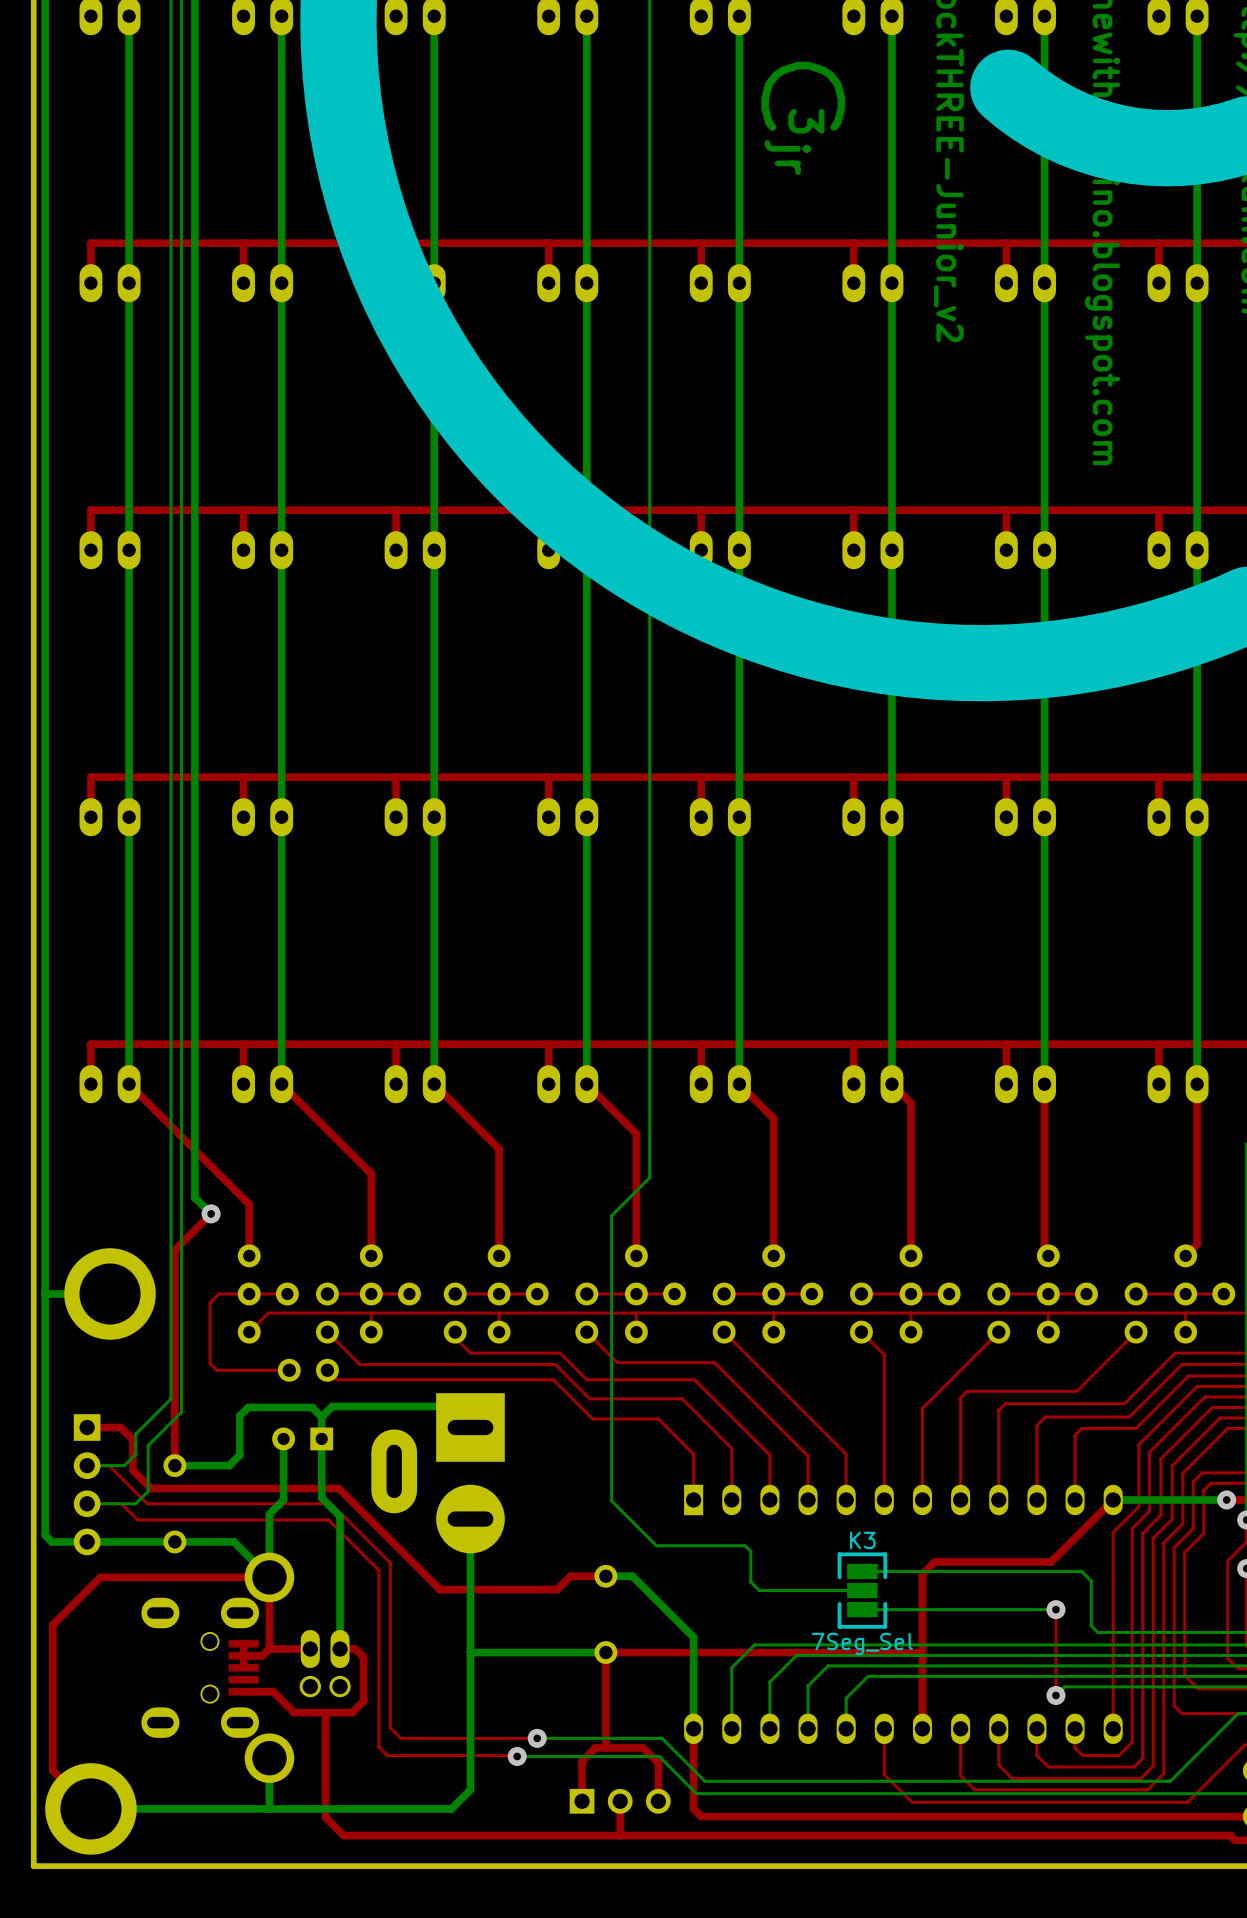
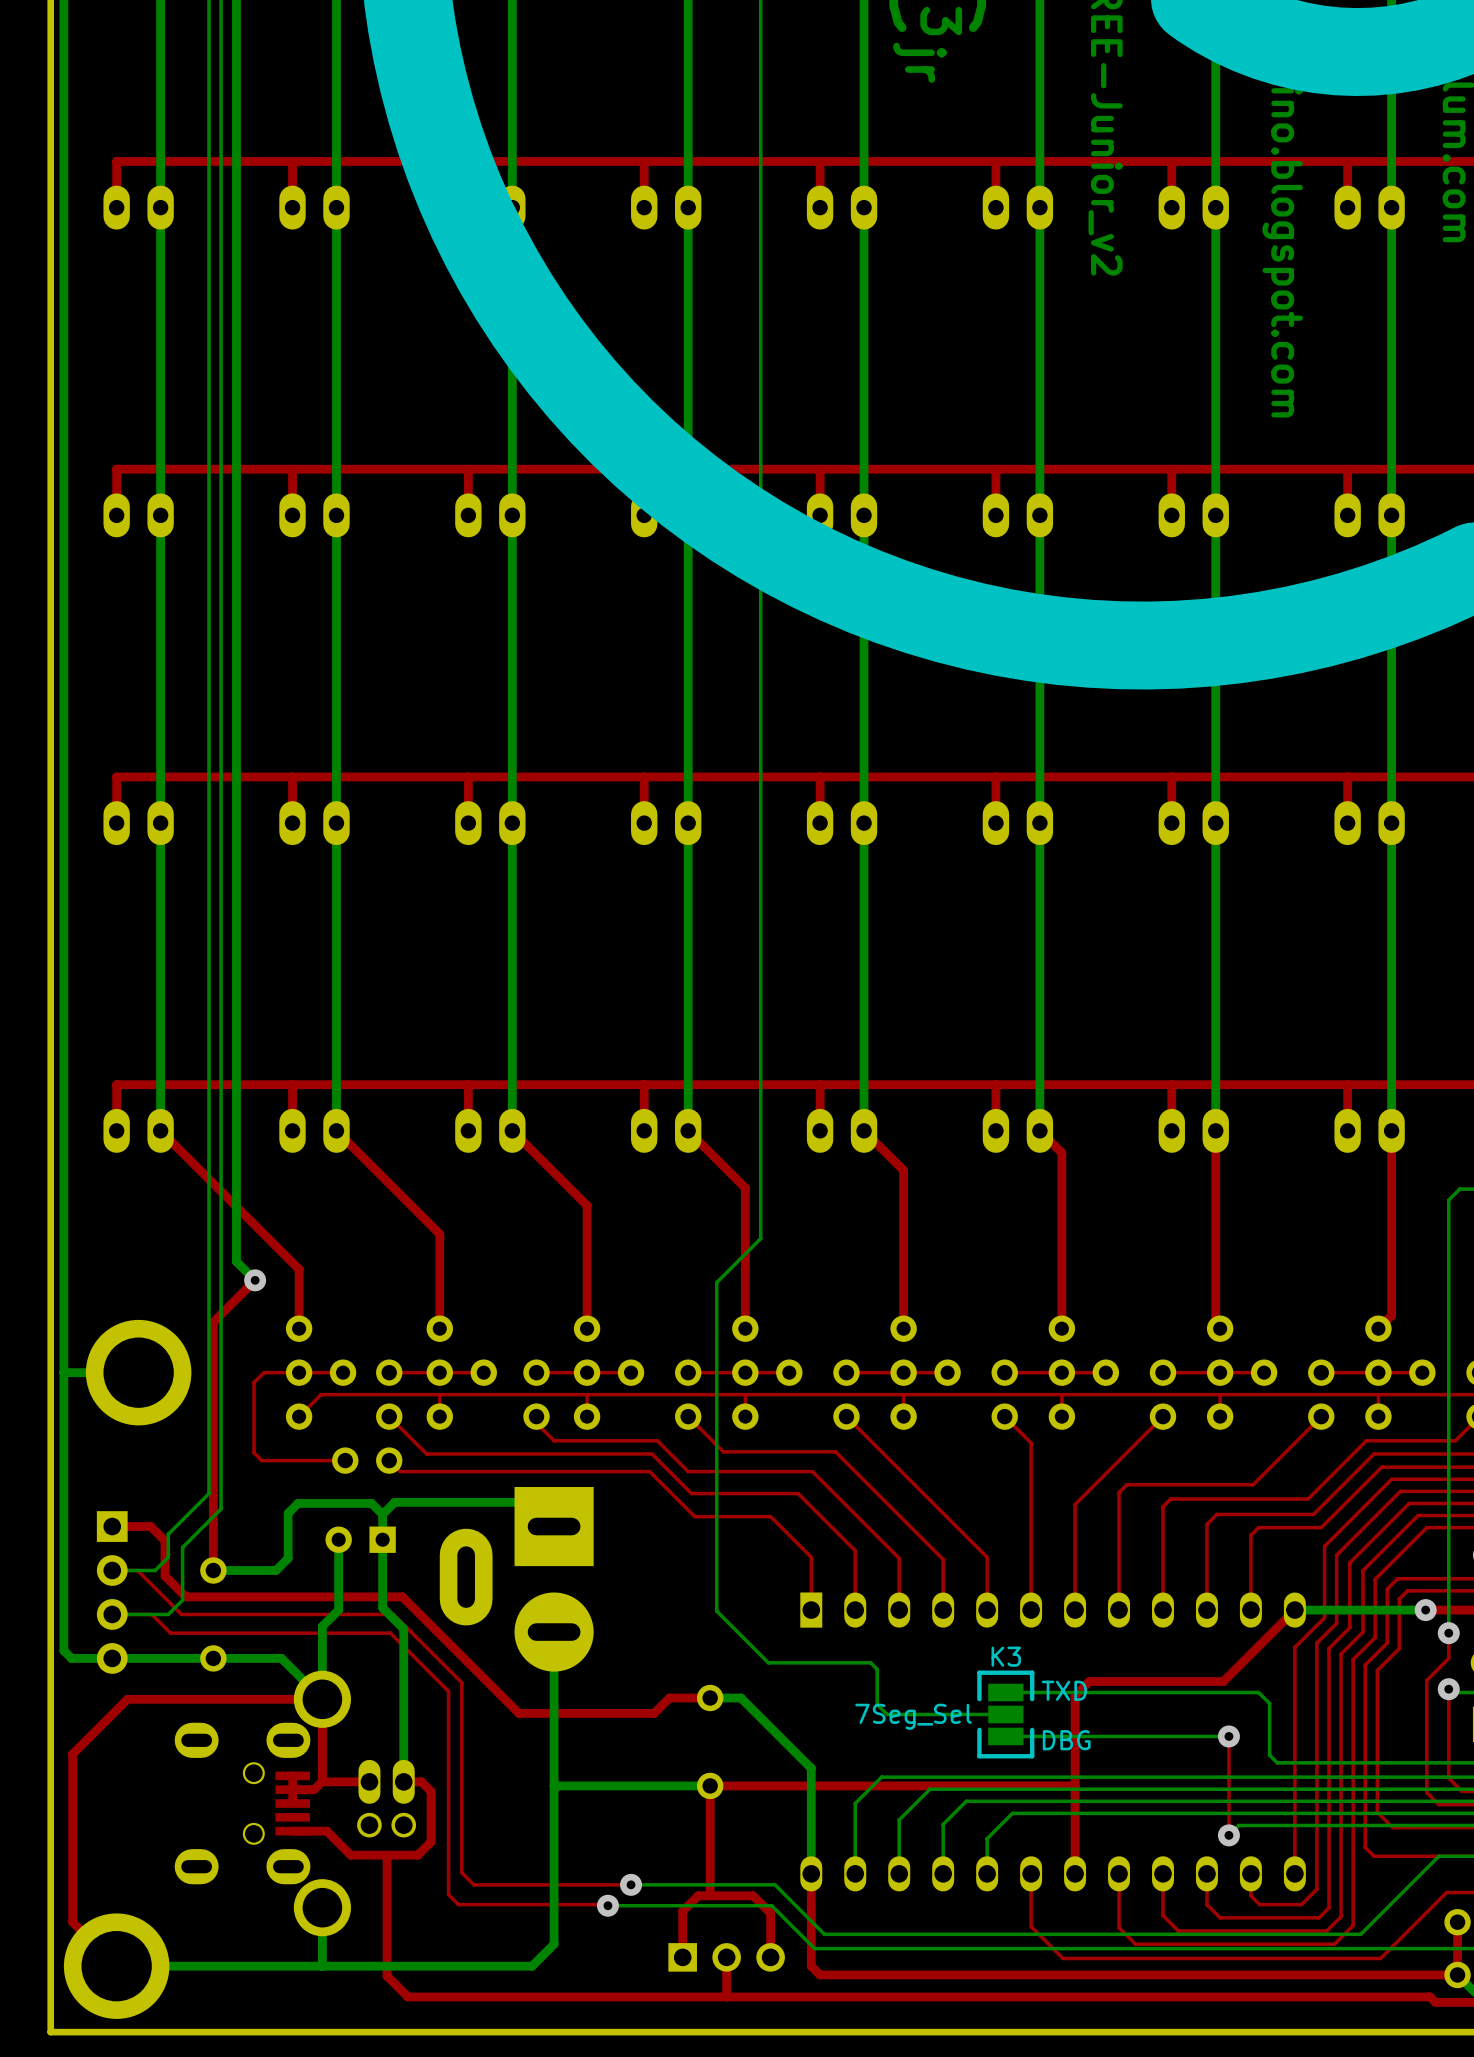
text: none -> TXD (1064, 1690)
text: none -> DBG (1066, 1740)
K3 value position: 7Seg_Sel (862, 1644) -> 7Seg_Sel (913, 1716)

